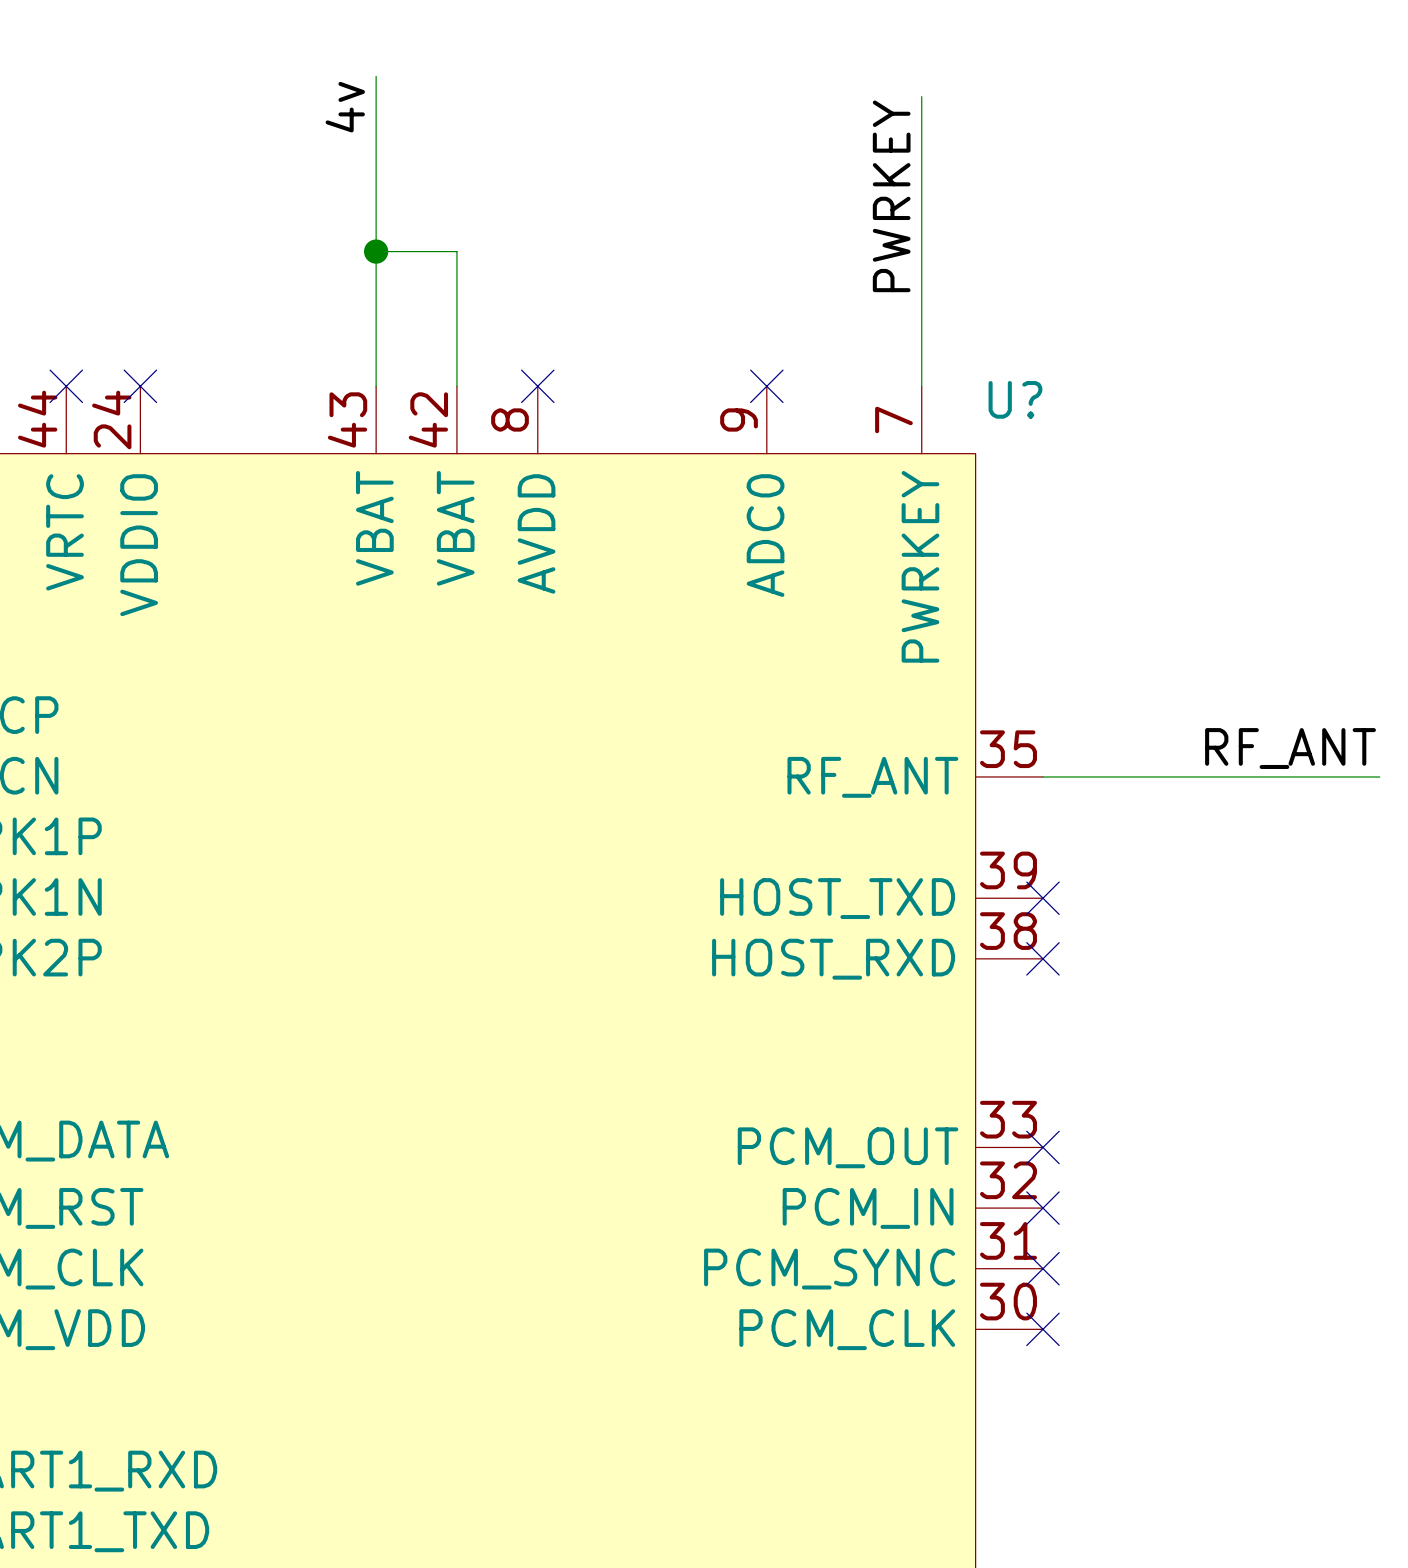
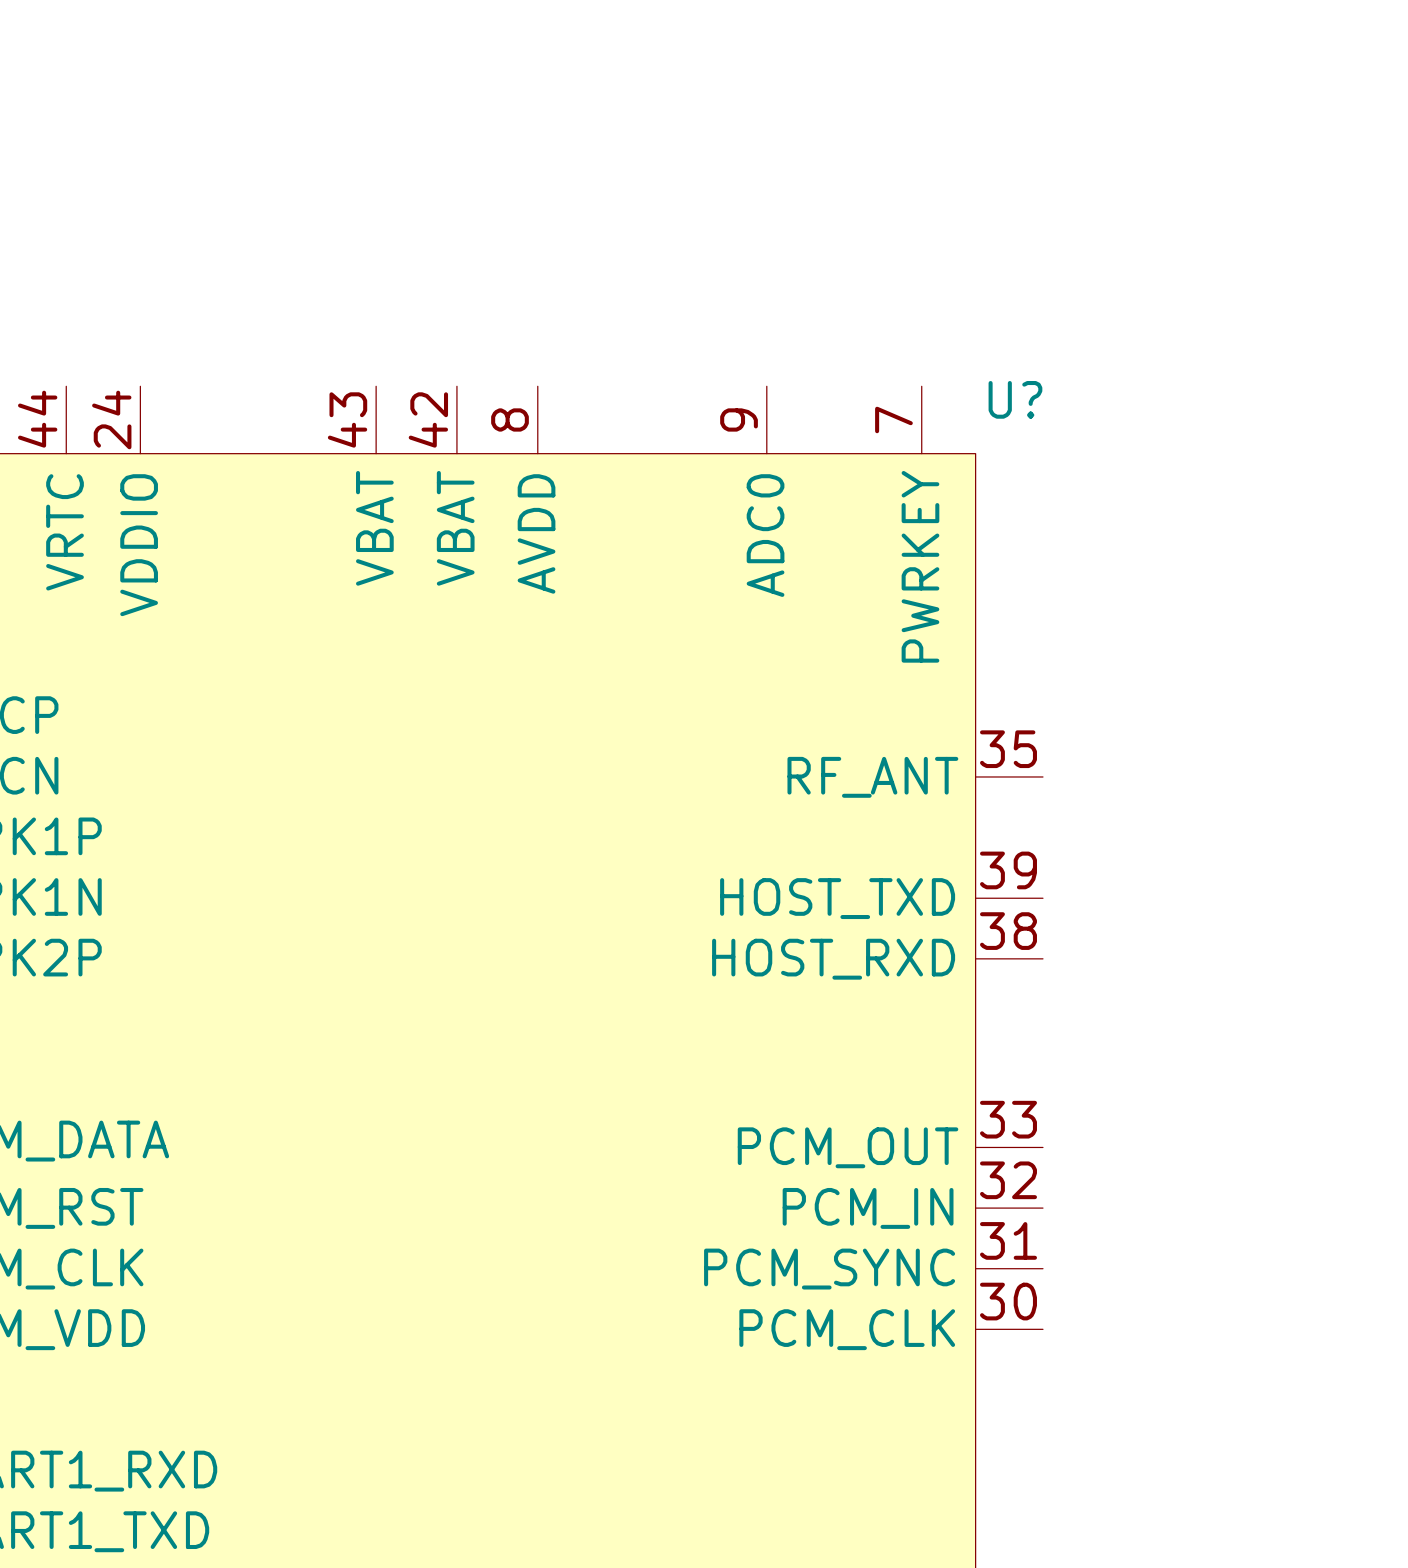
wire: (376, 76) (376, 386) -> none
wire: (921, 96) (921, 386) -> none
label: 4v (345, 107) -> none
label: PWRKEY (891, 196) -> none
wire: (376, 251) (456, 251) (456, 386) -> none
junction: (376, 251) -> none
no-connect mark: (66, 386) -> none
no-connect mark: (140, 386) -> none
no-connect mark: (537, 386) -> none
no-connect mark: (766, 386) -> none
label: RF_ANT (1290, 748) -> none
wire: (1042, 776) (1379, 776) -> none
no-connect mark: (1042, 898) -> none
no-connect mark: (1042, 958) -> none
no-connect mark: (1042, 1147) -> none
no-connect mark: (1042, 1208) -> none
no-connect mark: (1042, 1268) -> none
no-connect mark: (1042, 1329) -> none

